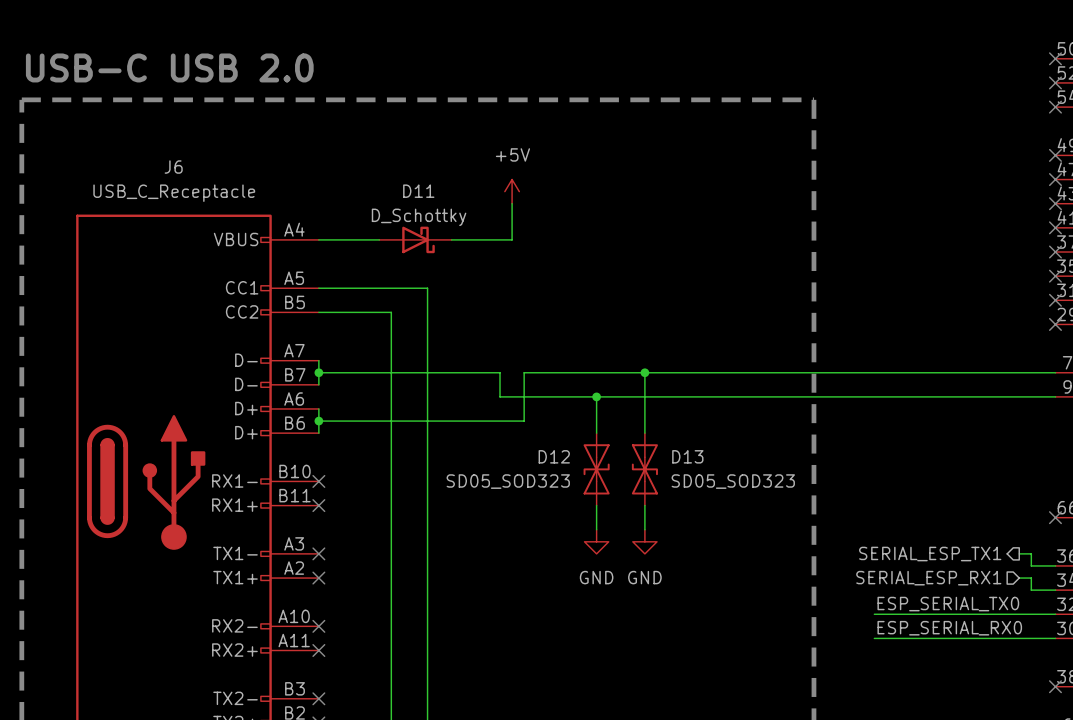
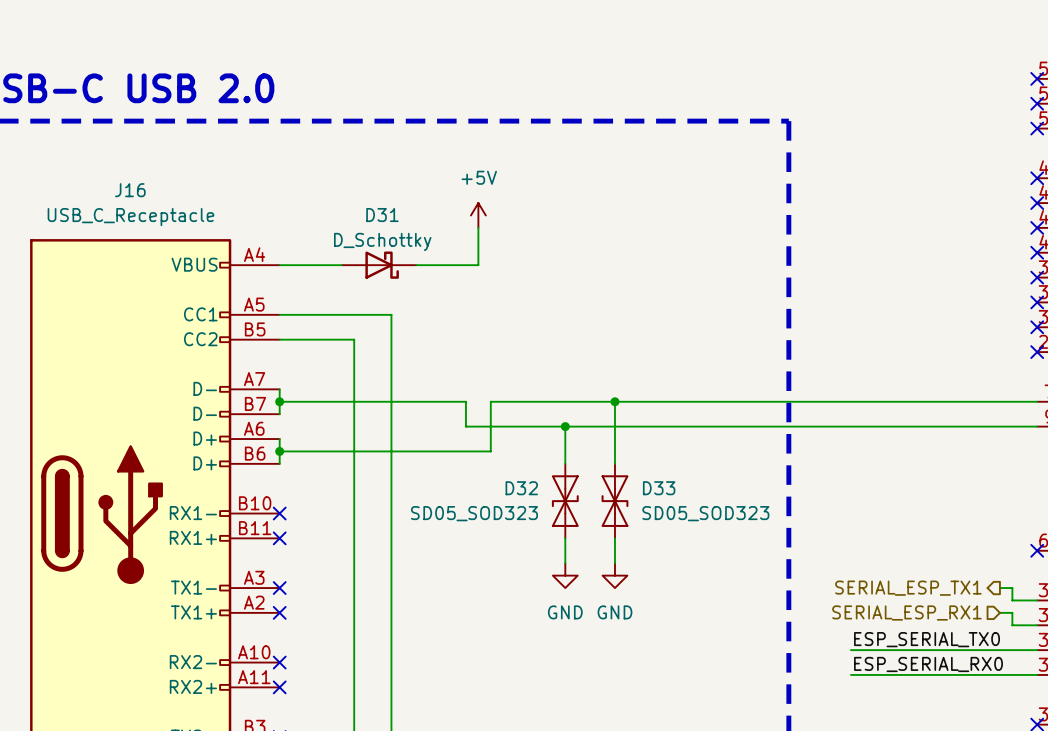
J6 name: J6 (173, 167) -> J16 (130, 190)
D11 name: D11 (418, 191) -> D31 (382, 215)
D12 name: D12 (554, 456) -> D32 (521, 488)
D13 name: D13 (687, 456) -> D33 (659, 488)

